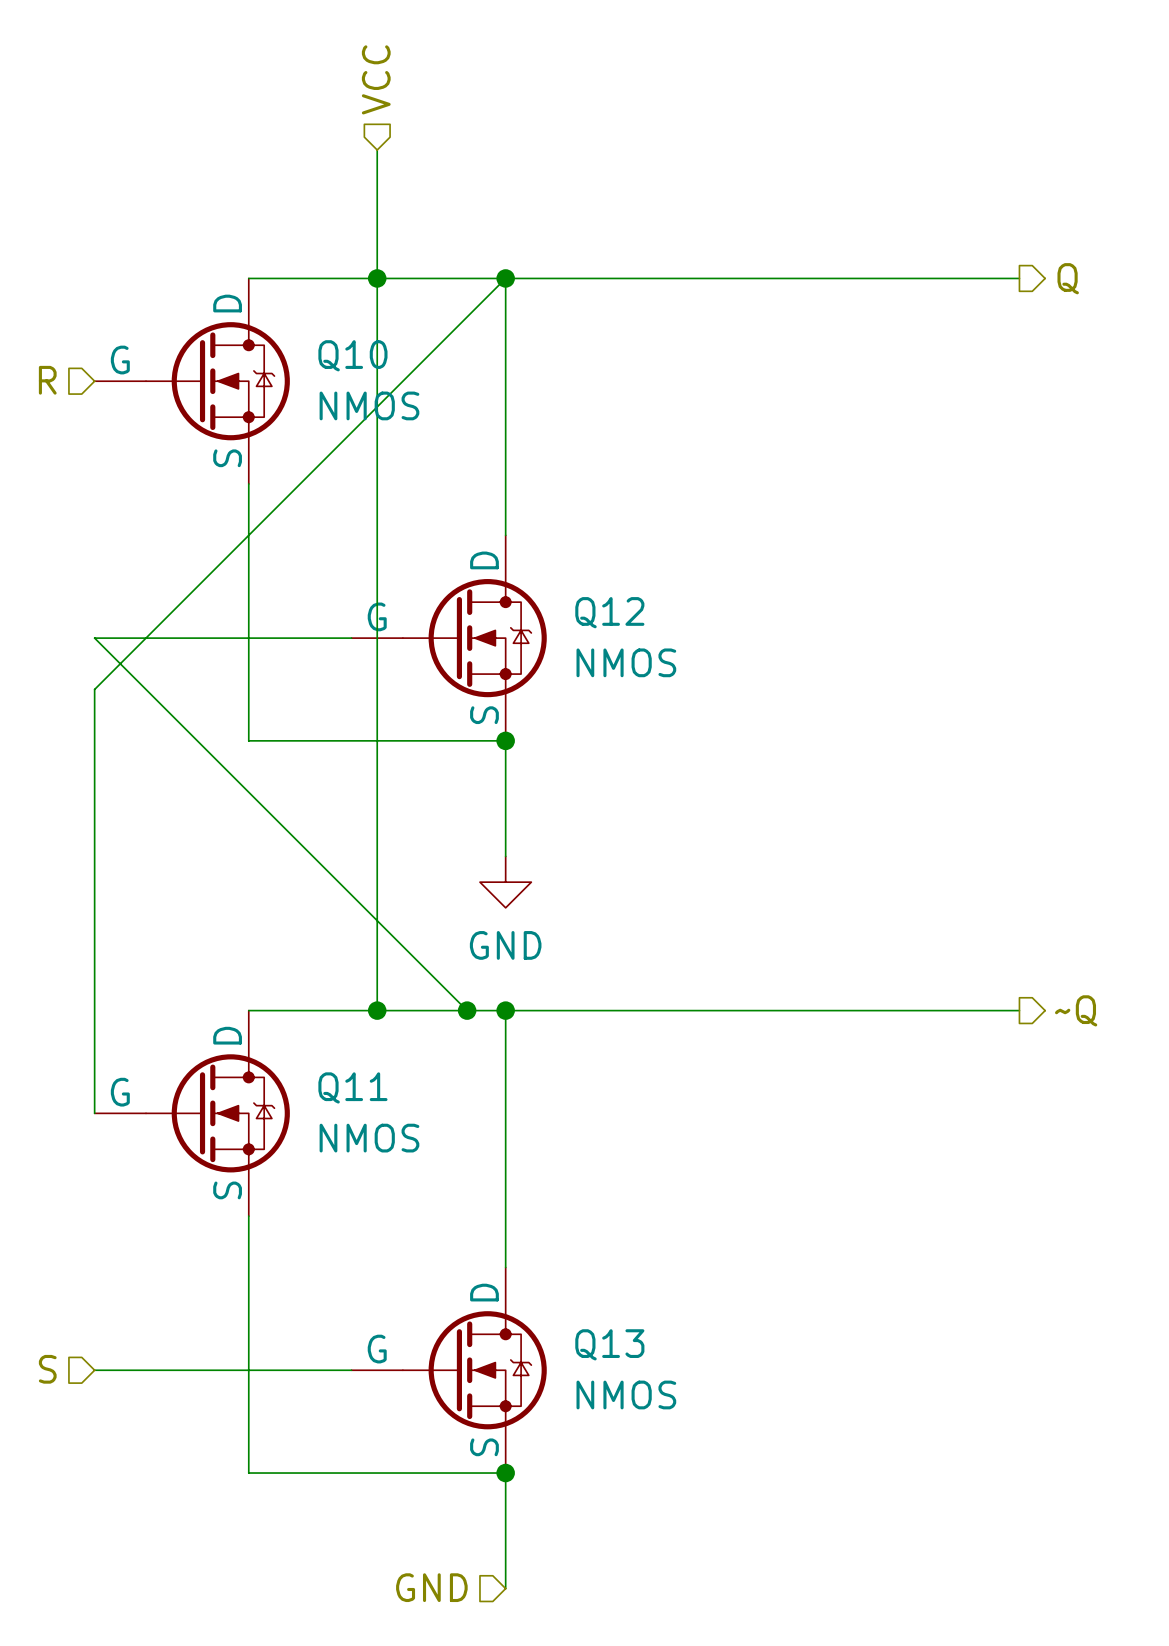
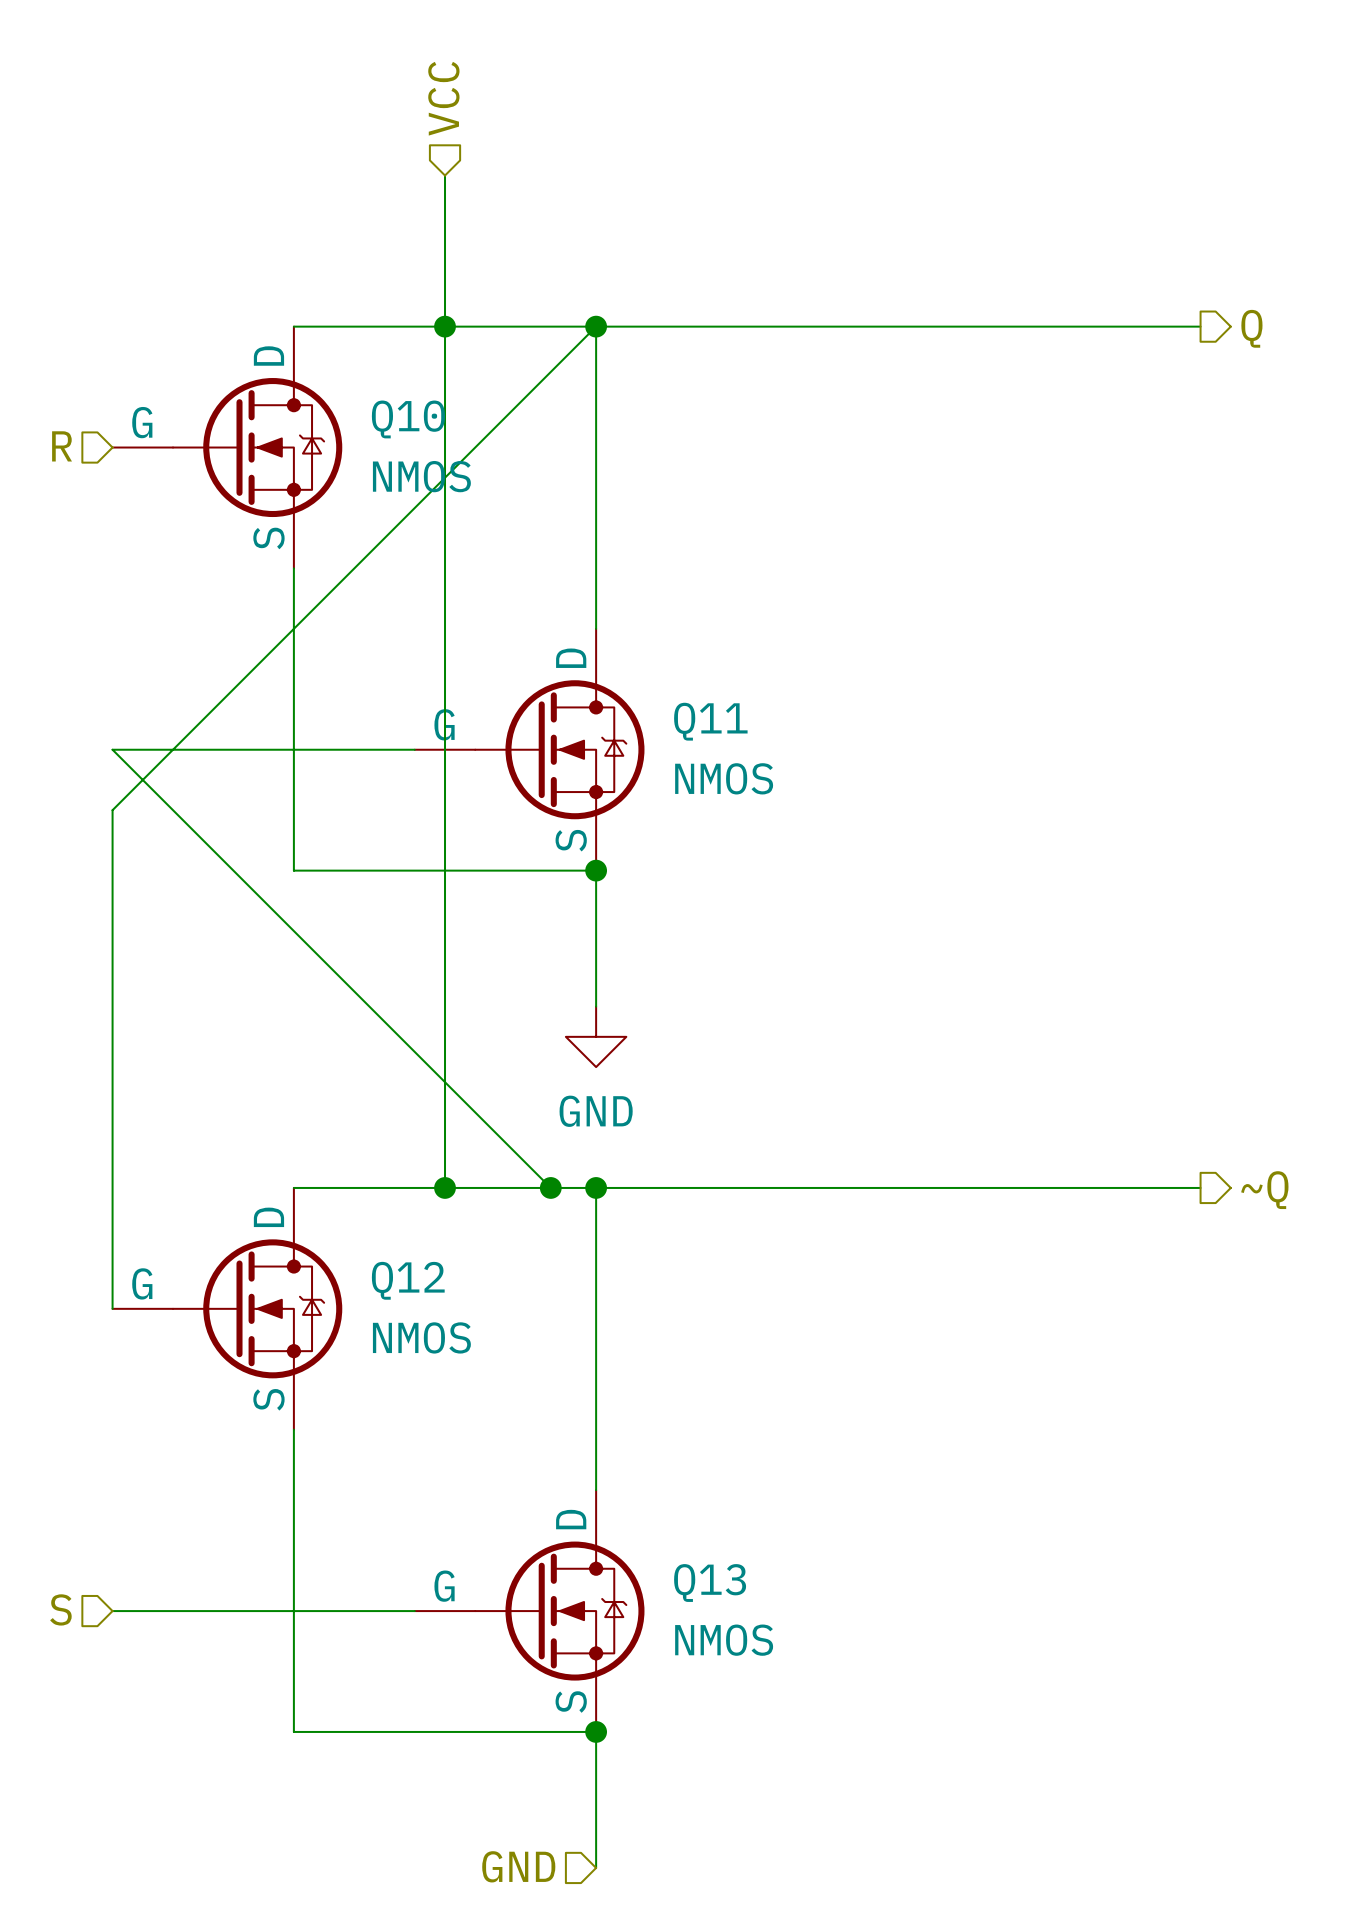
Q12 name: Q12 (609, 612) -> Q11 (710, 721)
Q11 name: Q11 (352, 1087) -> Q12 (408, 1280)

